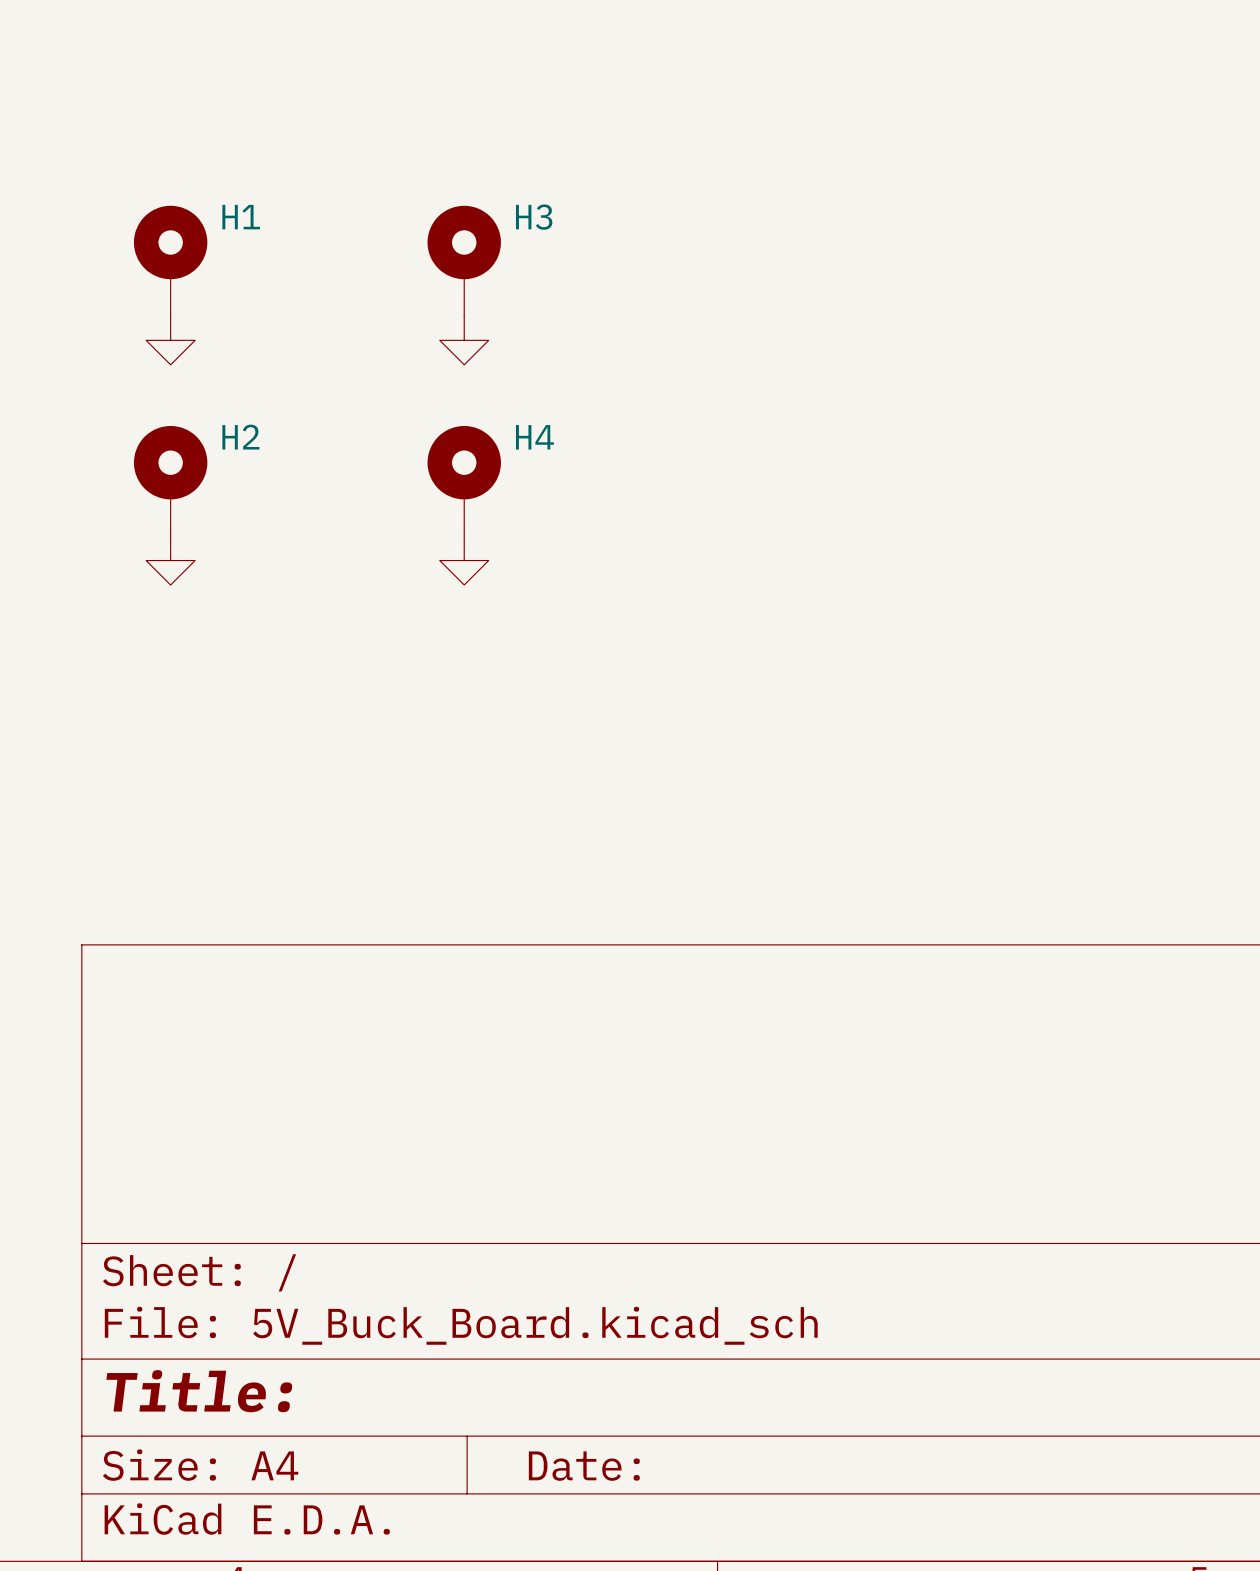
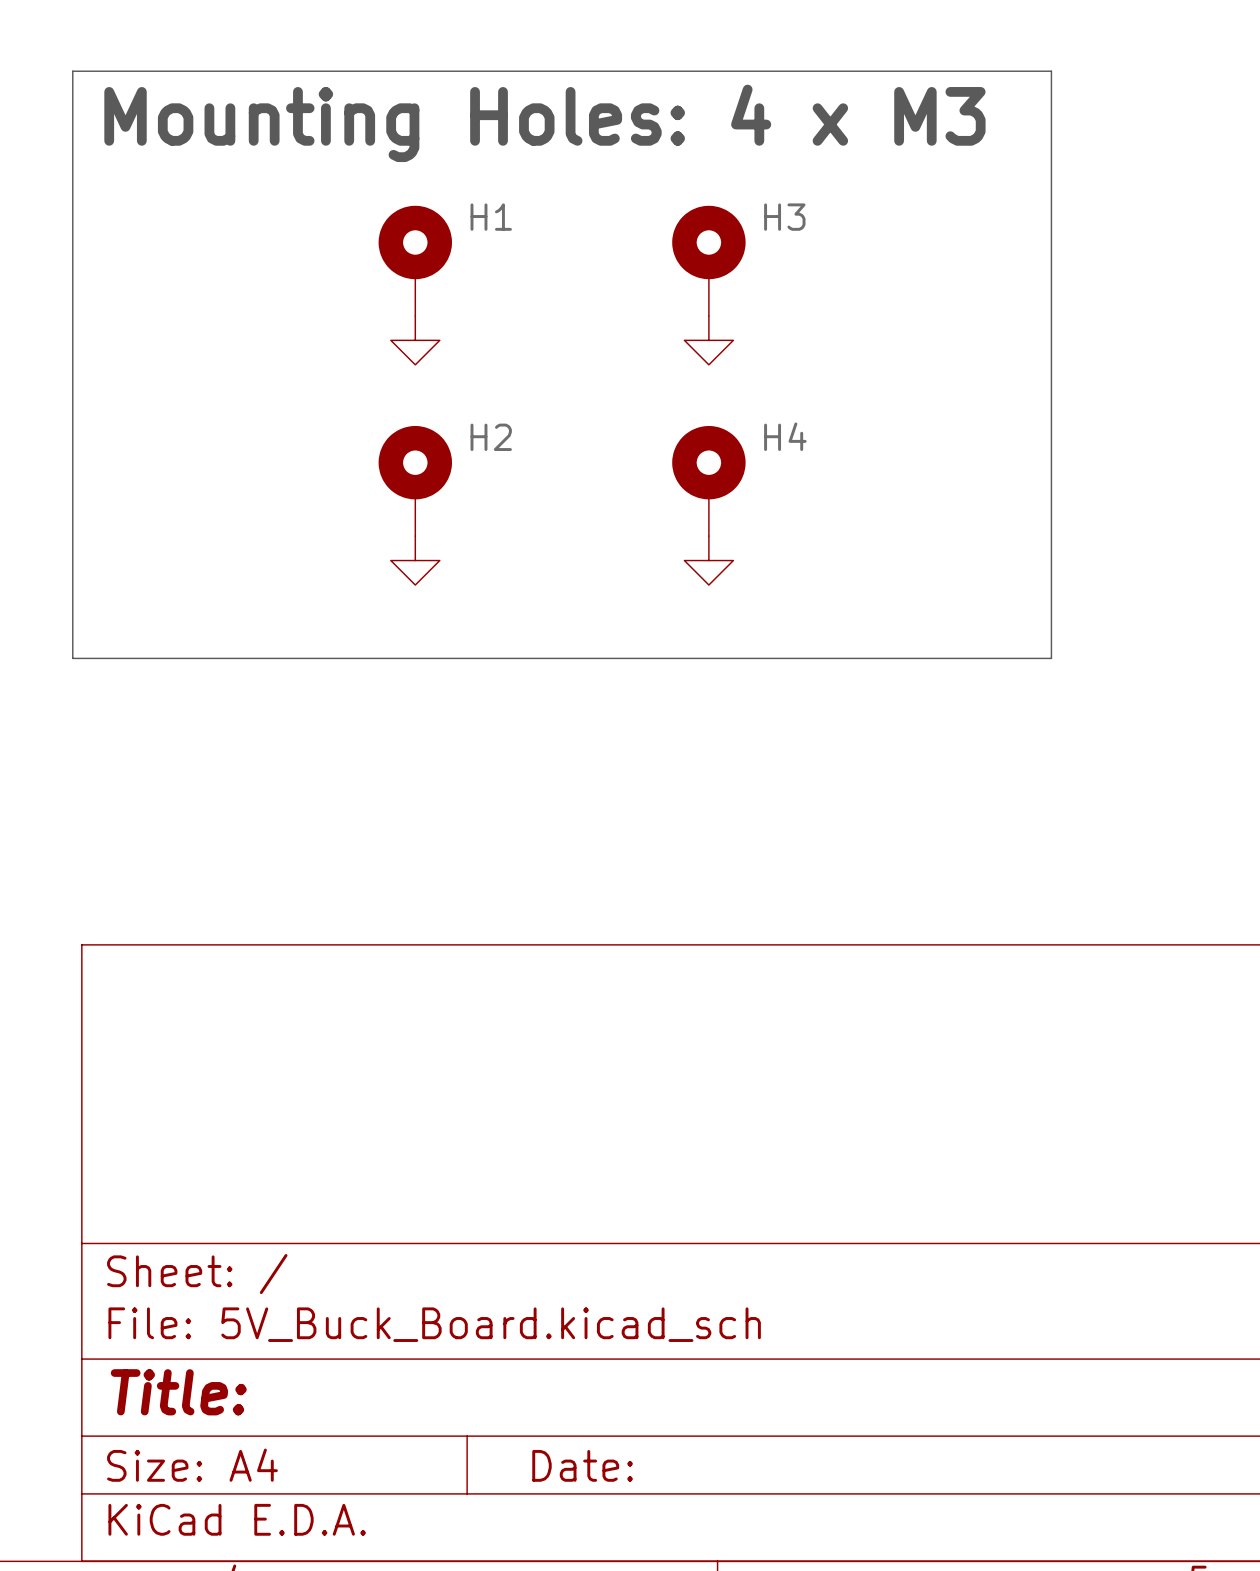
line: none -> (72, 71) (1051, 71) (1051, 658) (72, 658) (72, 71)
text: none -> Mounting Holes: 4 x M3 (544, 123)
H1 position: (170, 260) -> (415, 260)
H3 position: (464, 260) -> (708, 260)
power symbol: (170, 340) -> none
power symbol position: (464, 340) -> (415, 340)
power symbol: none -> (708, 340)
H2 position: (170, 481) -> (415, 481)
H4 position: (464, 481) -> (708, 481)
power symbol: (170, 560) -> none
power symbol position: (464, 560) -> (415, 560)
power symbol: none -> (708, 560)

